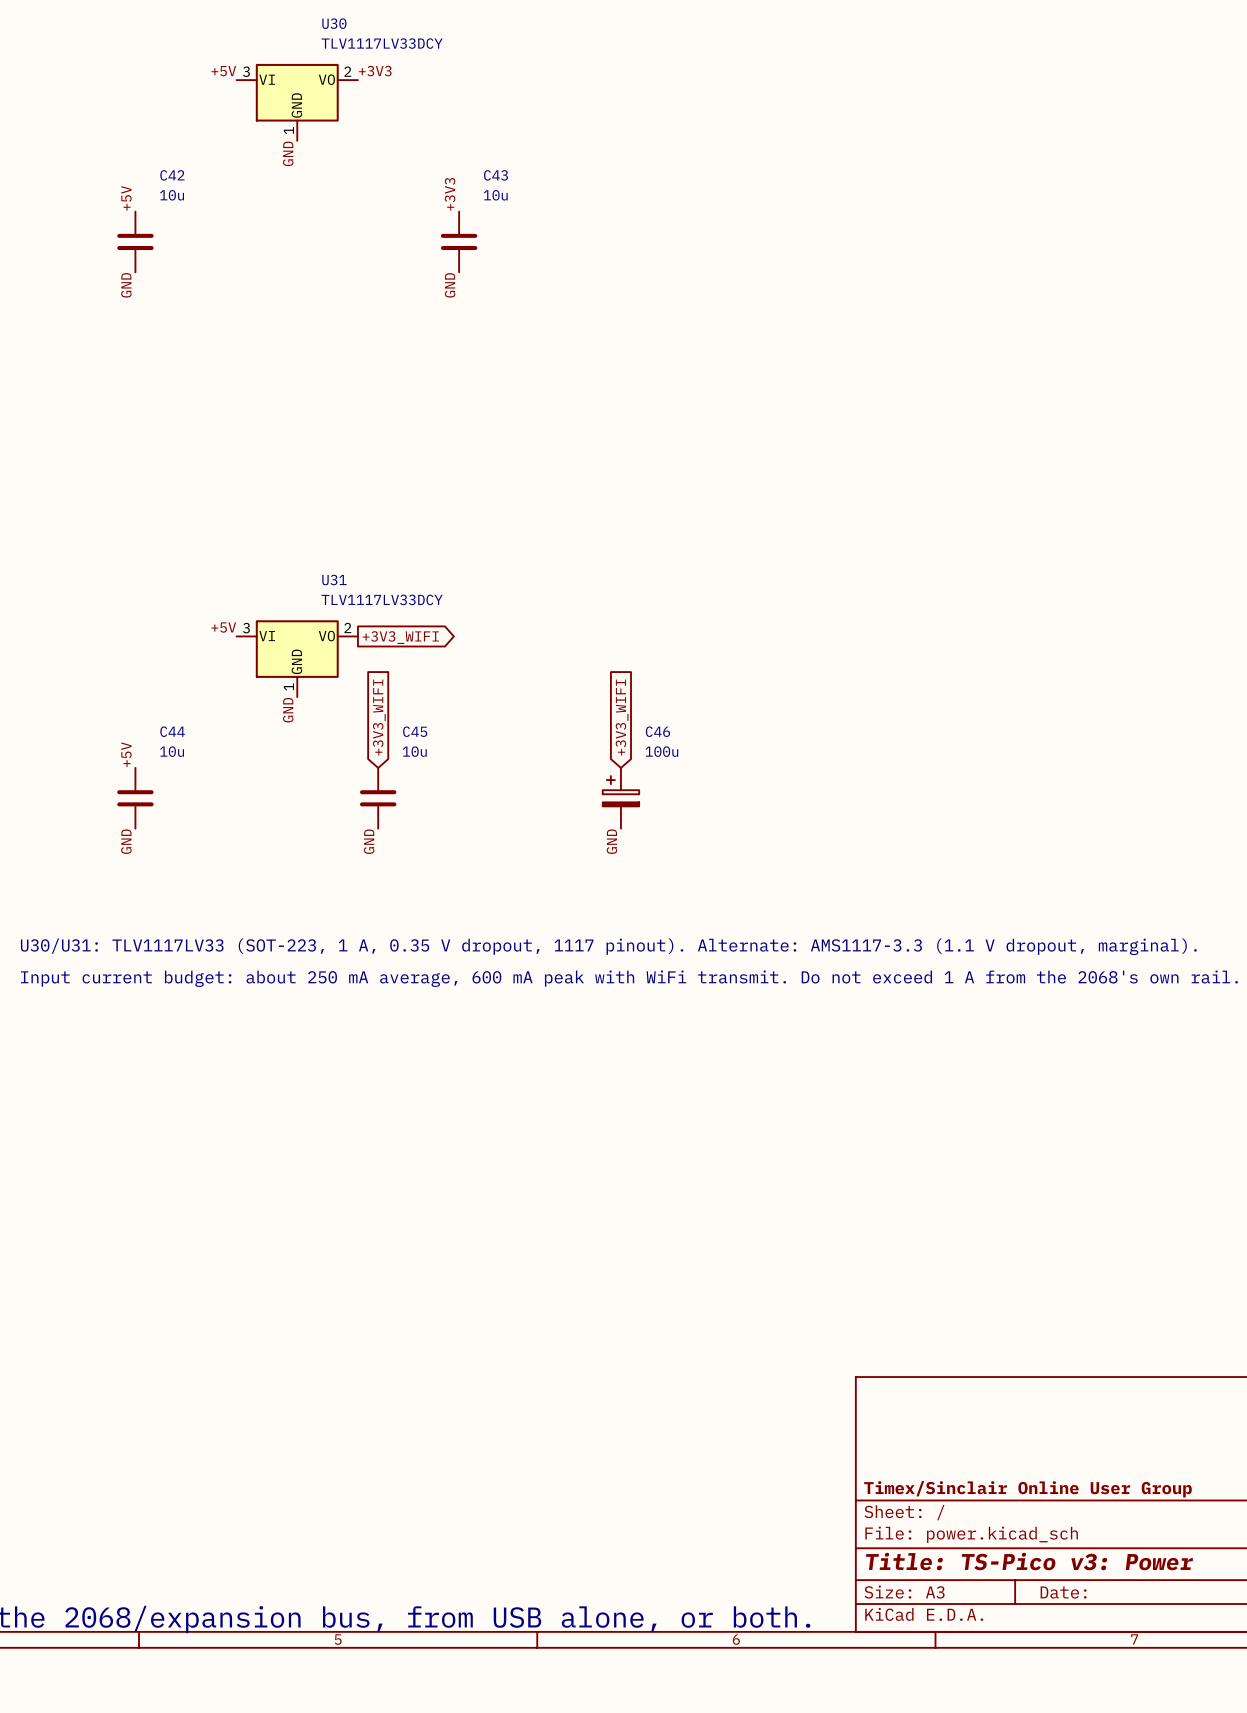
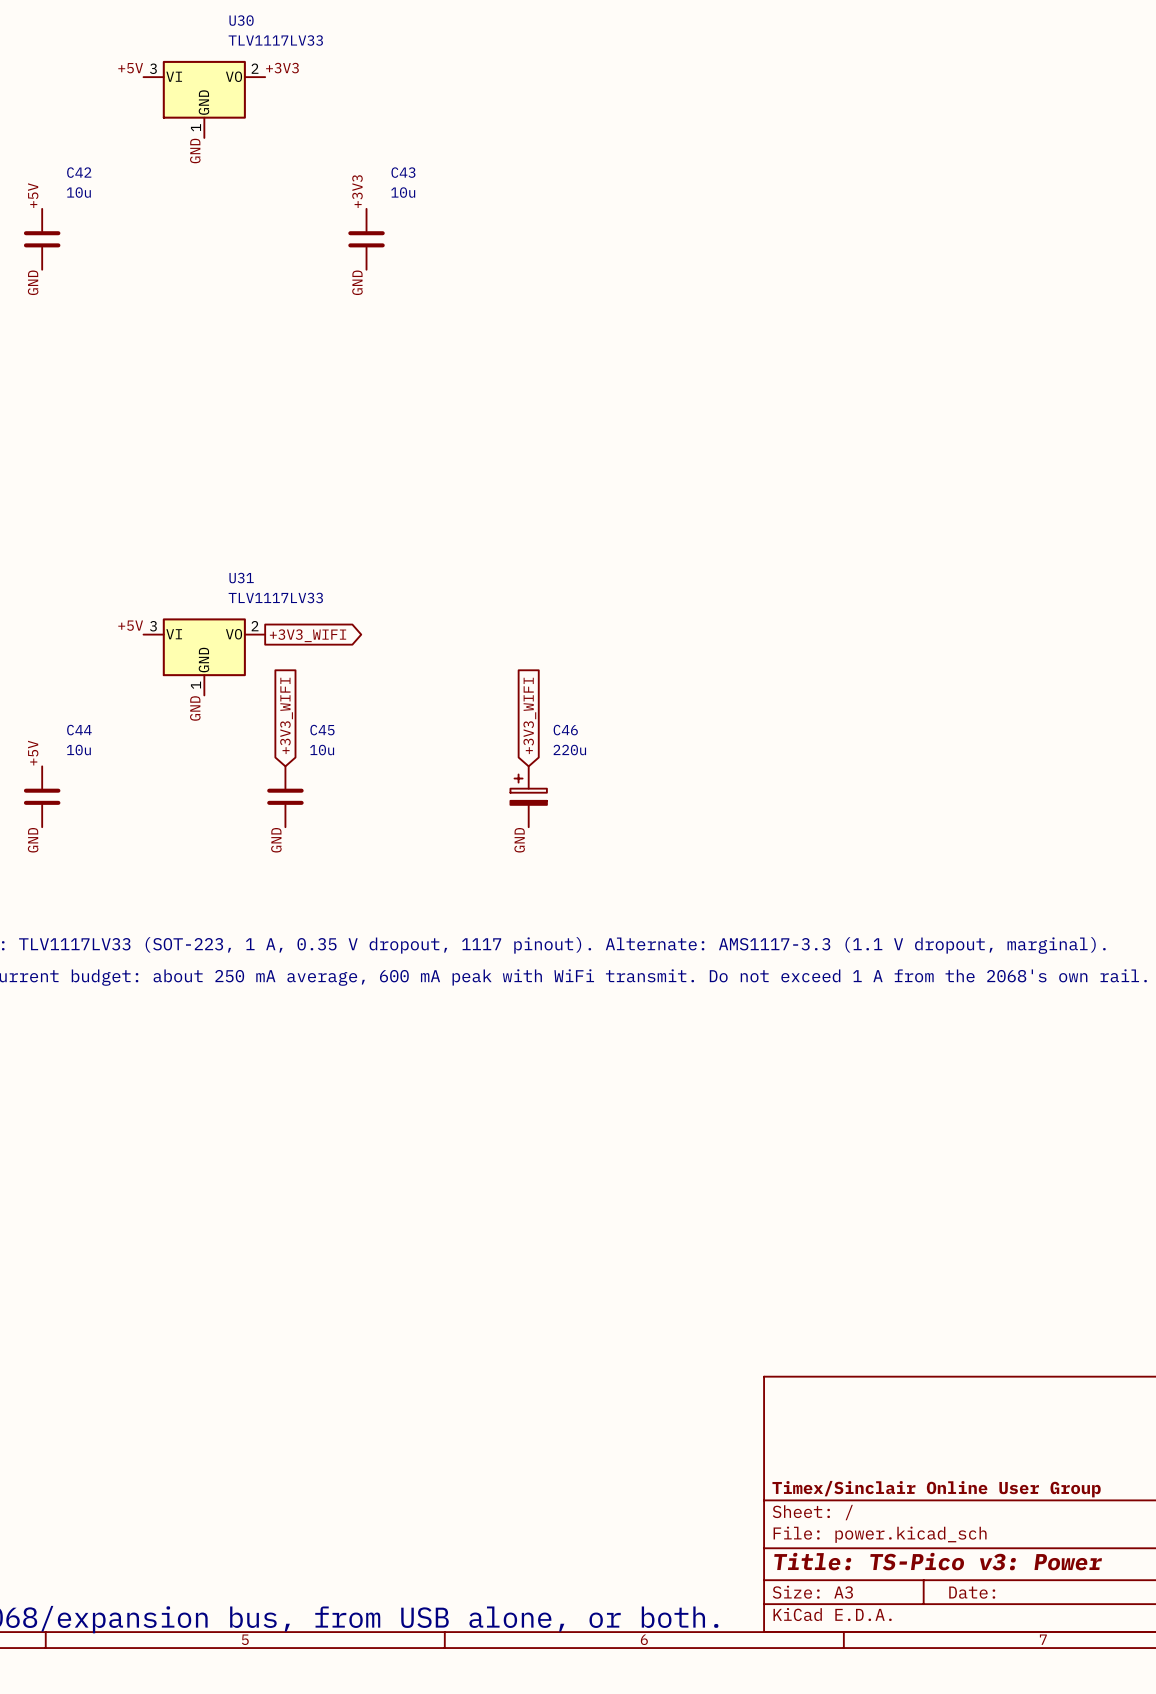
U30 value: TLV1117LV33DCY (382, 43) -> TLV1117LV33 (275, 40)
U31 value: TLV1117LV33DCY (382, 599) -> TLV1117LV33 (275, 597)
C46 value: 100u (661, 751) -> 220u (569, 750)

